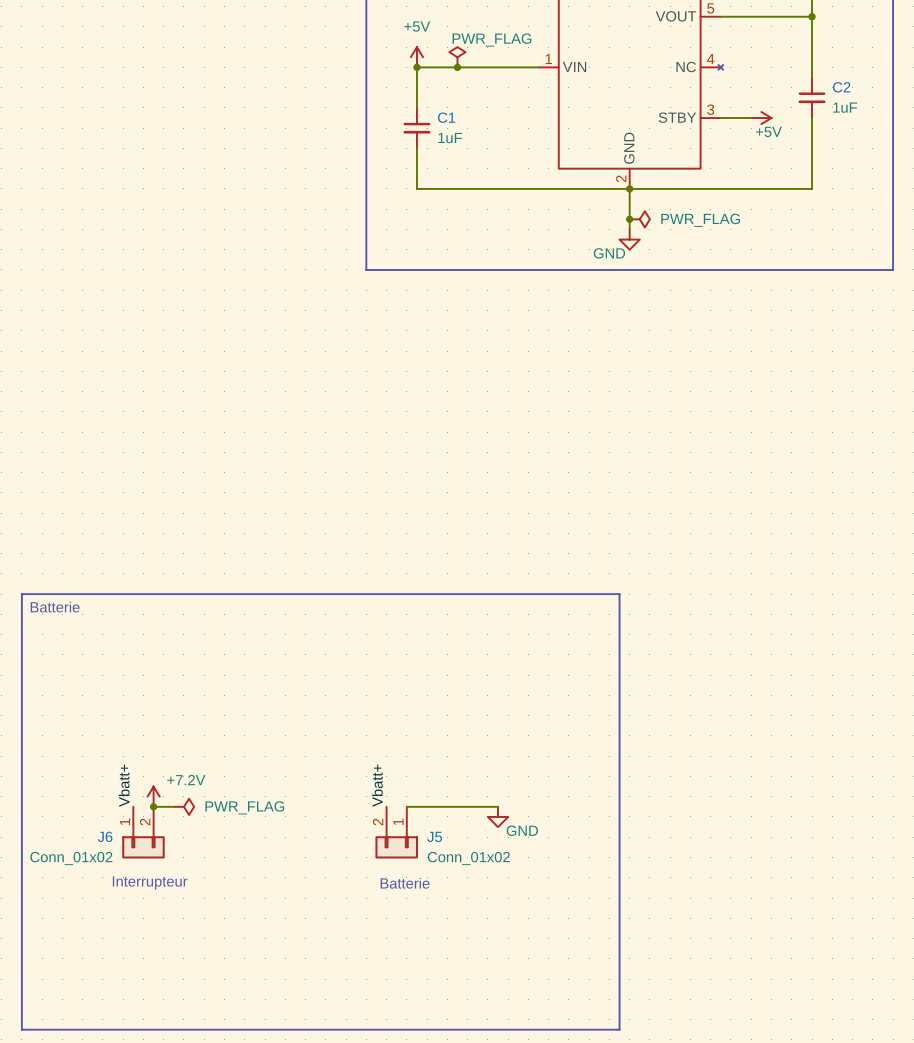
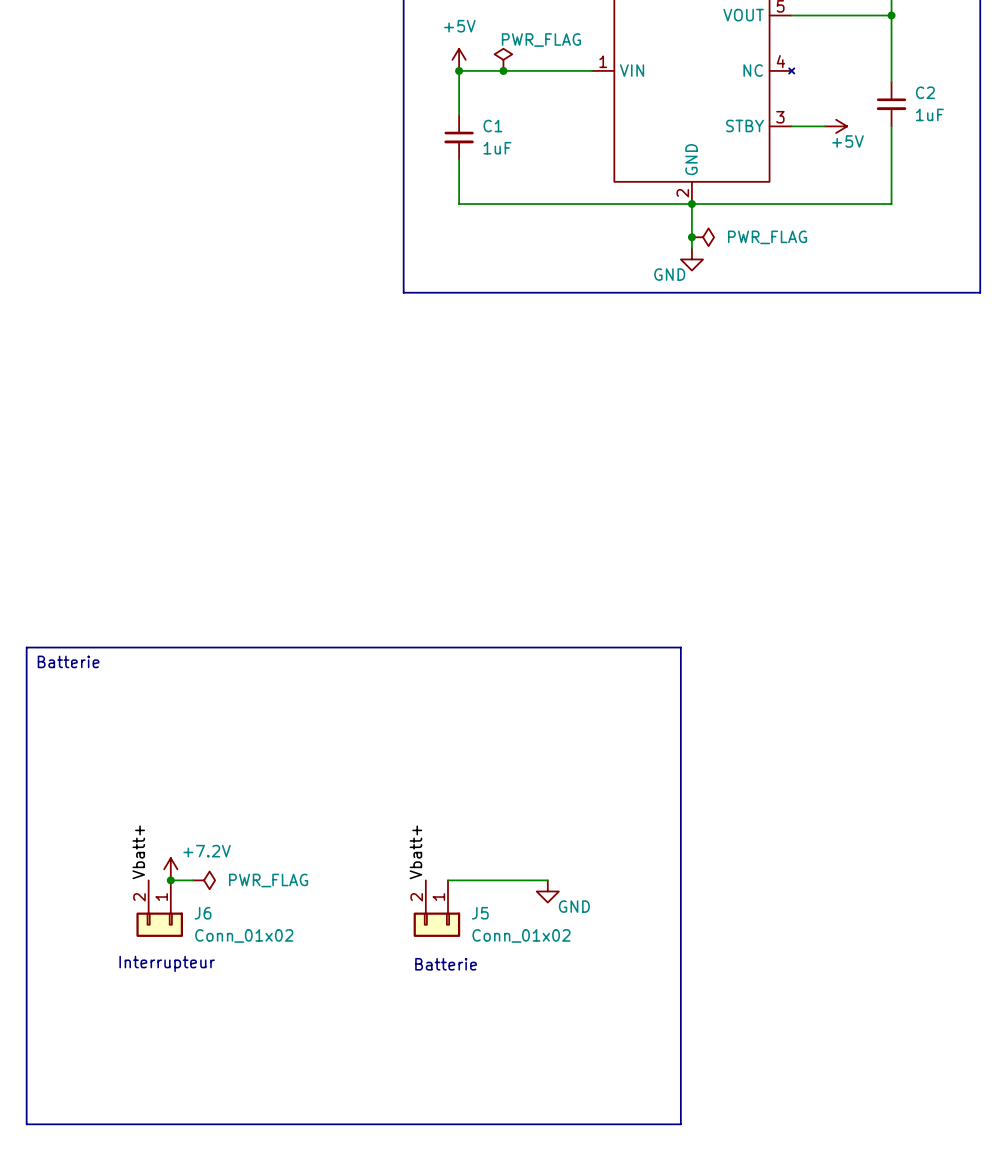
J6 flip: as is (143, 847) -> left-right (159, 924)

